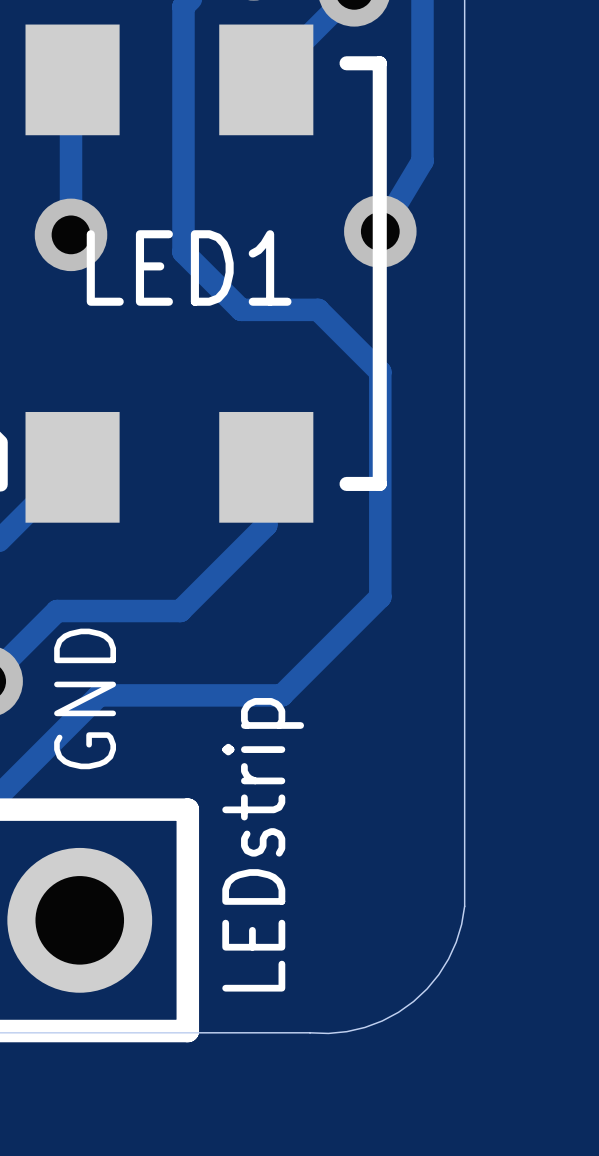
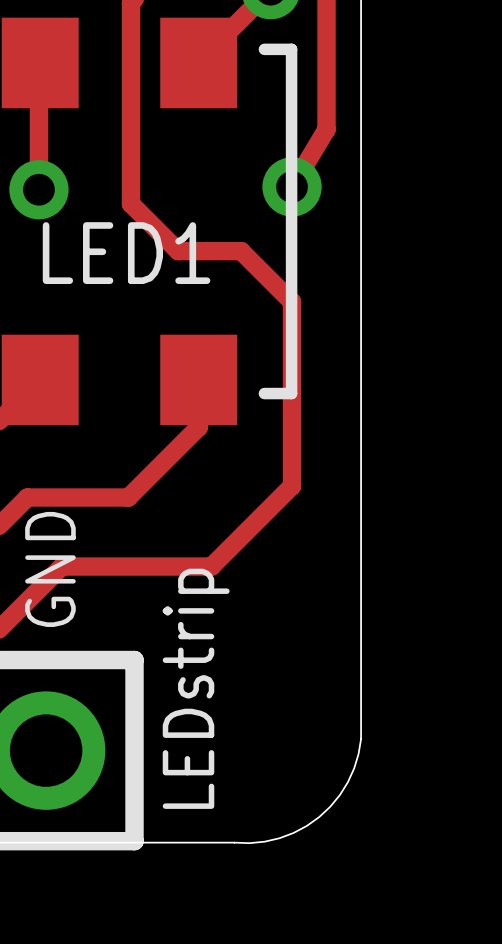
LED1 name position: LED1 (189, 267) -> LED1 (126, 253)

